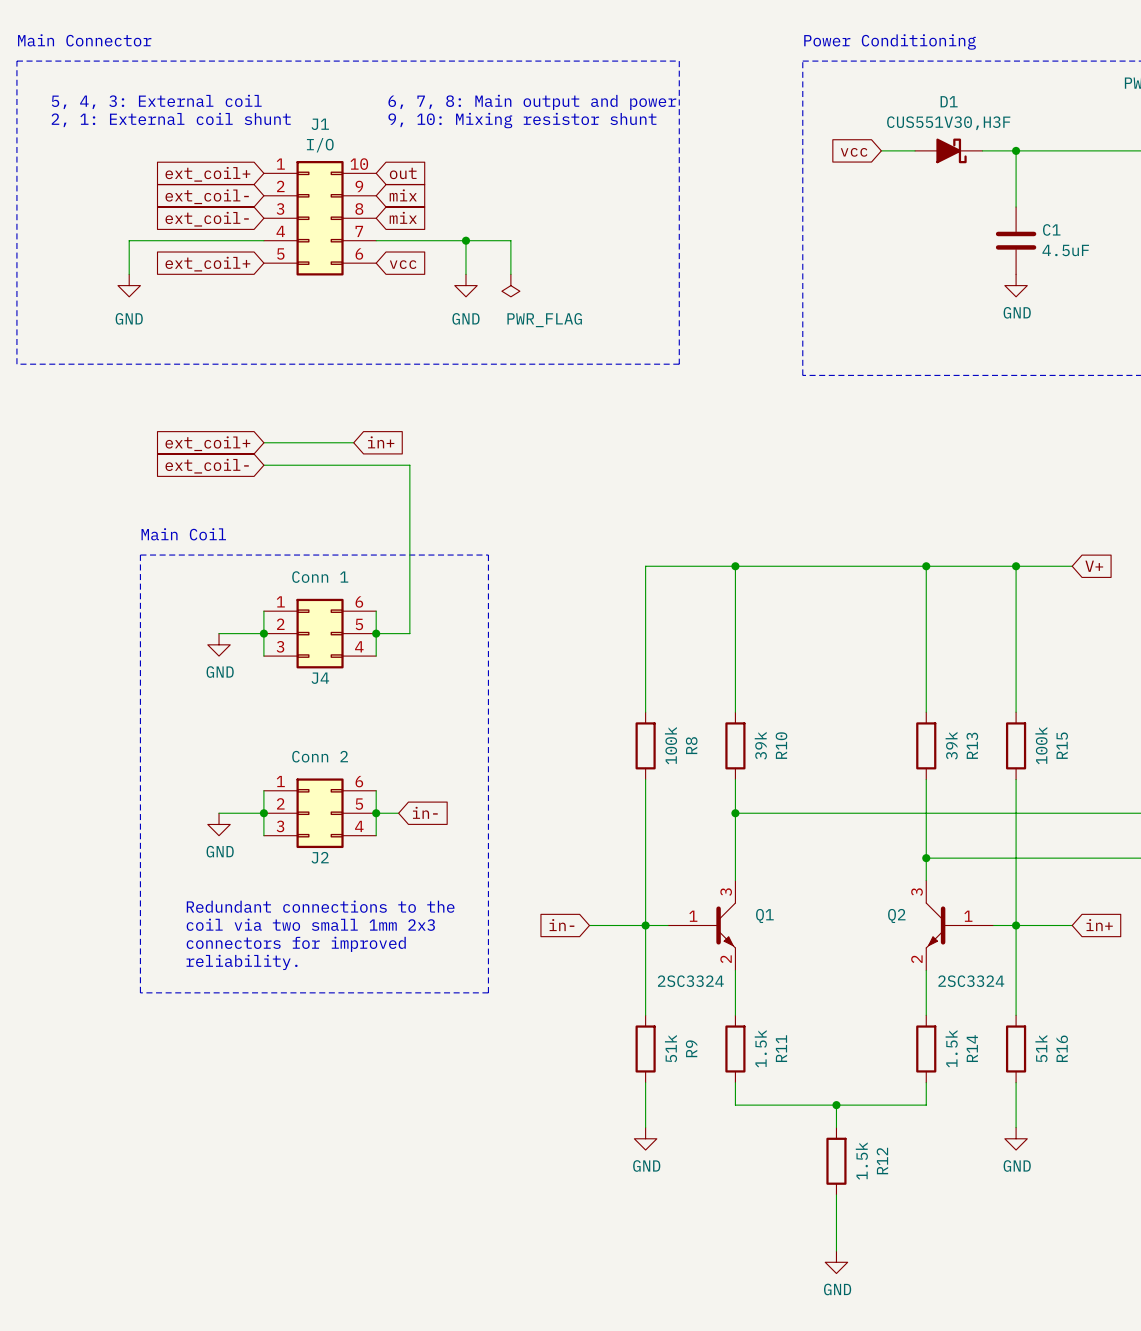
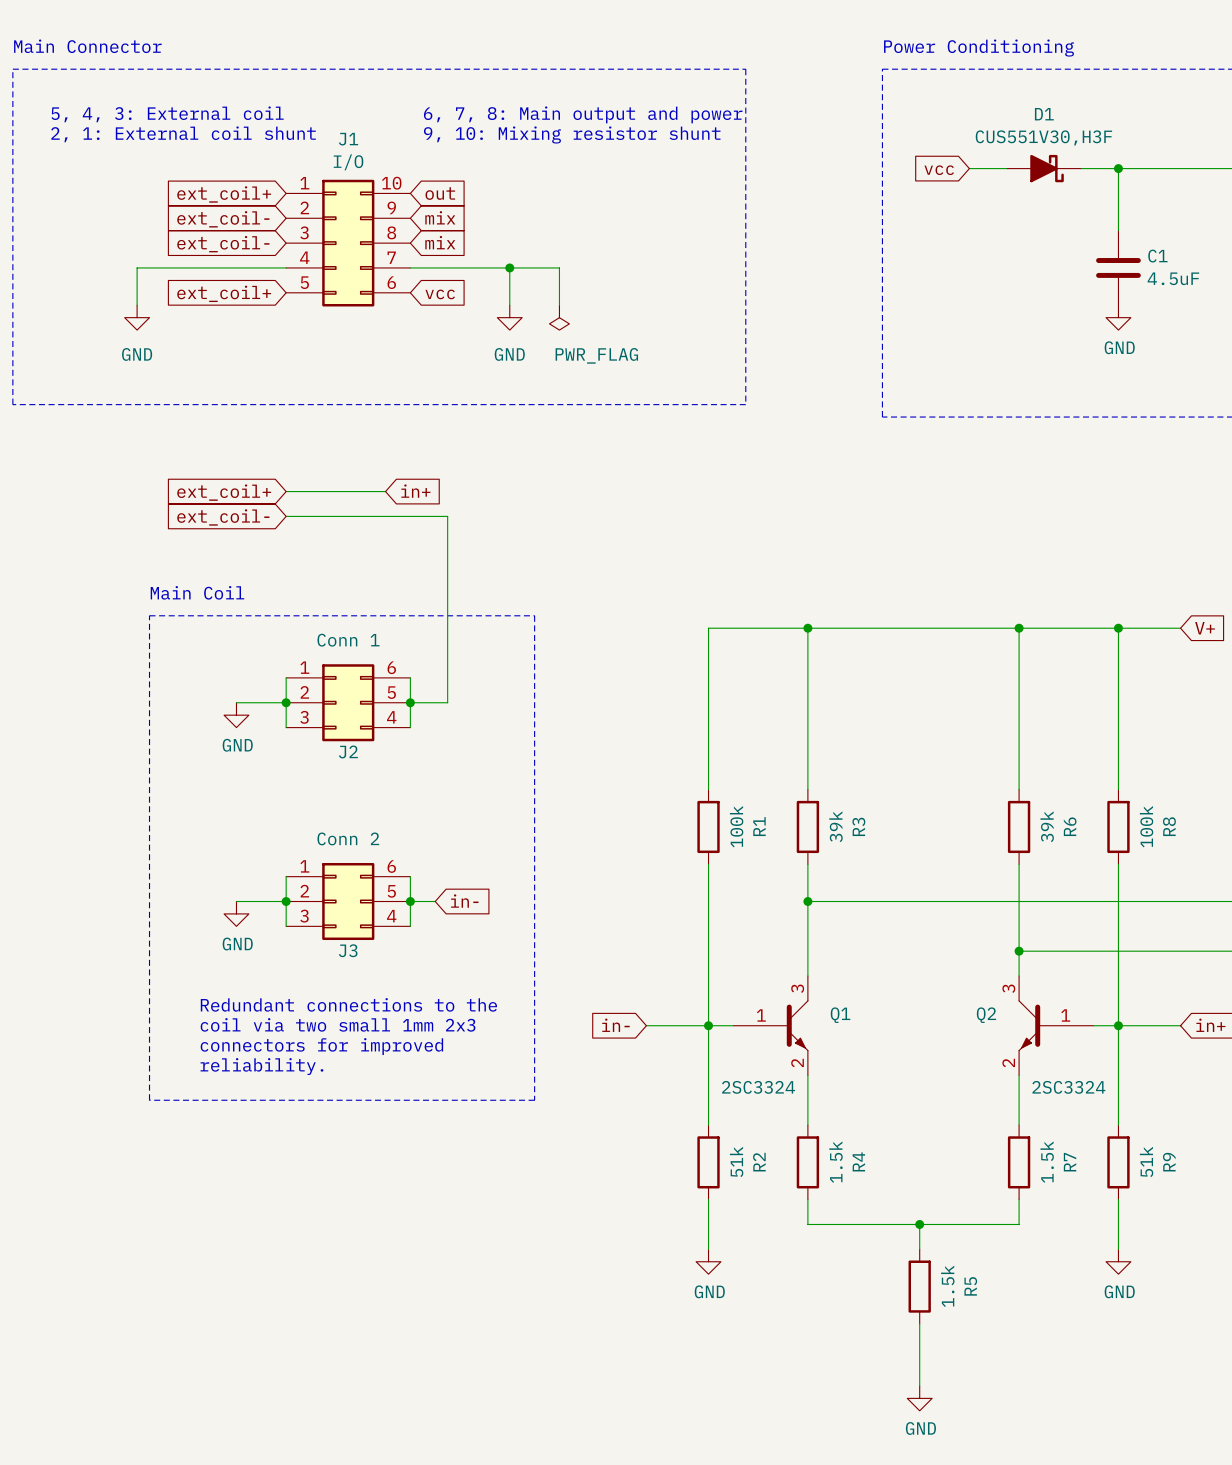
J4 name: J4 (320, 678) -> J2 (348, 751)
R8 name: R8 (691, 745) -> R1 (759, 826)
R10 name: R10 (781, 745) -> R3 (858, 826)
R13 name: R13 (972, 745) -> R6 (1070, 826)
R15 name: R15 (1062, 745) -> R8 (1169, 826)
J2 name: J2 (320, 857) -> J3 (348, 950)
R9 name: R9 (691, 1048) -> R2 (759, 1162)
R11 name: R11 (781, 1048) -> R4 (858, 1161)
R14 name: R14 (972, 1048) -> R7 (1070, 1162)
R16 name: R16 (1062, 1048) -> R9 (1169, 1162)
R12 name: R12 (882, 1161) -> R5 (970, 1286)

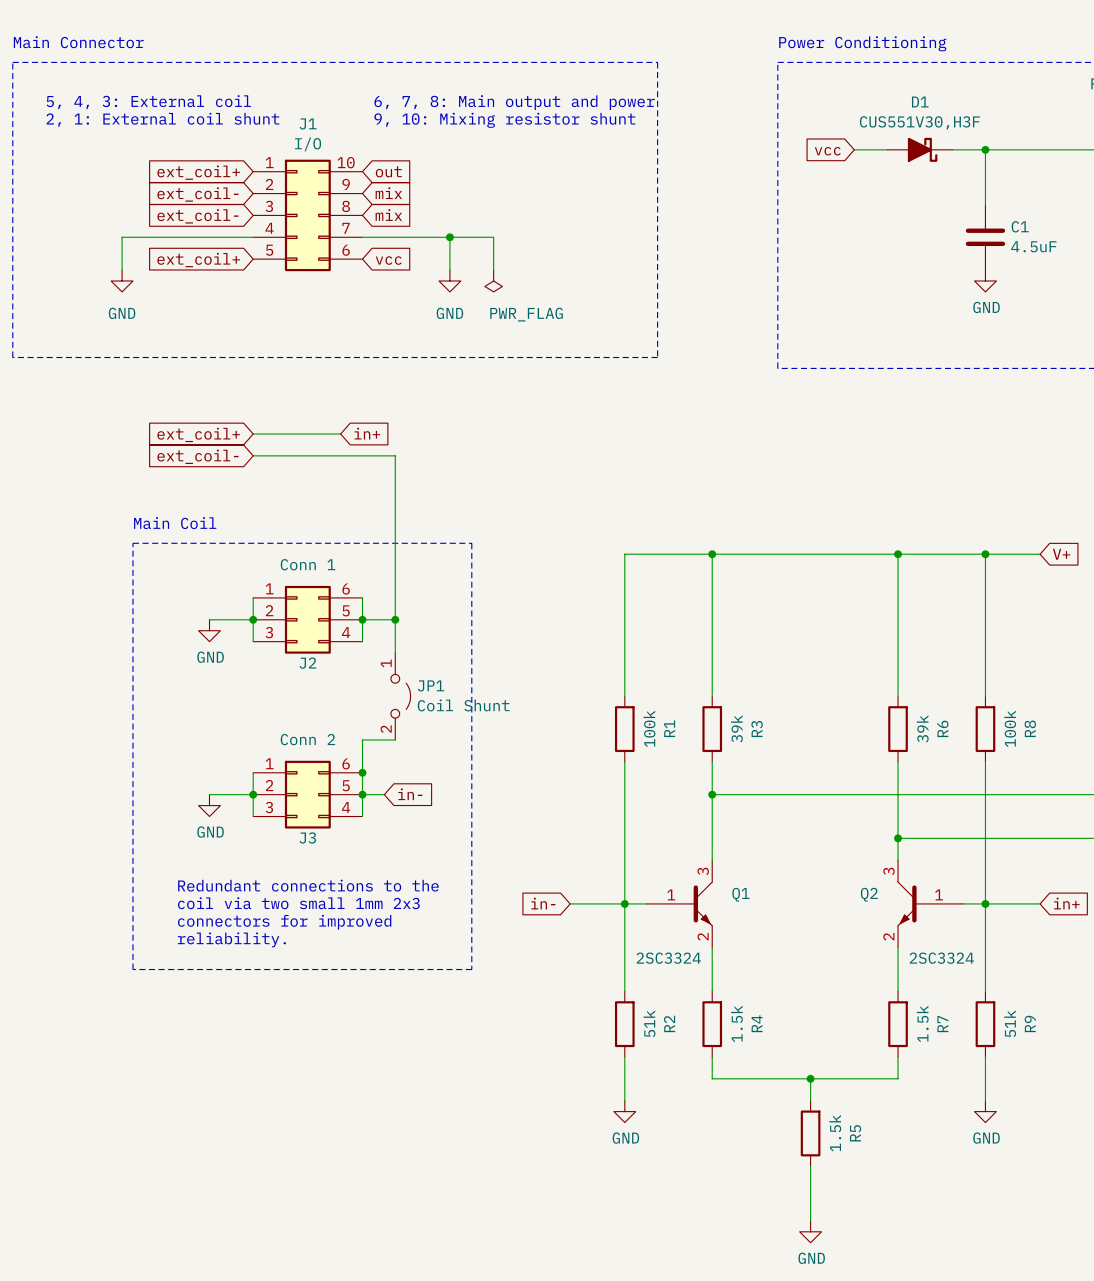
wire: none -> (395, 619) (395, 652)
junction: none -> (395, 619)
JP1: none -> Coil Shunt (400, 696)
wire: none -> (395, 740) (362, 740) (362, 772)
junction: none -> (362, 772)

